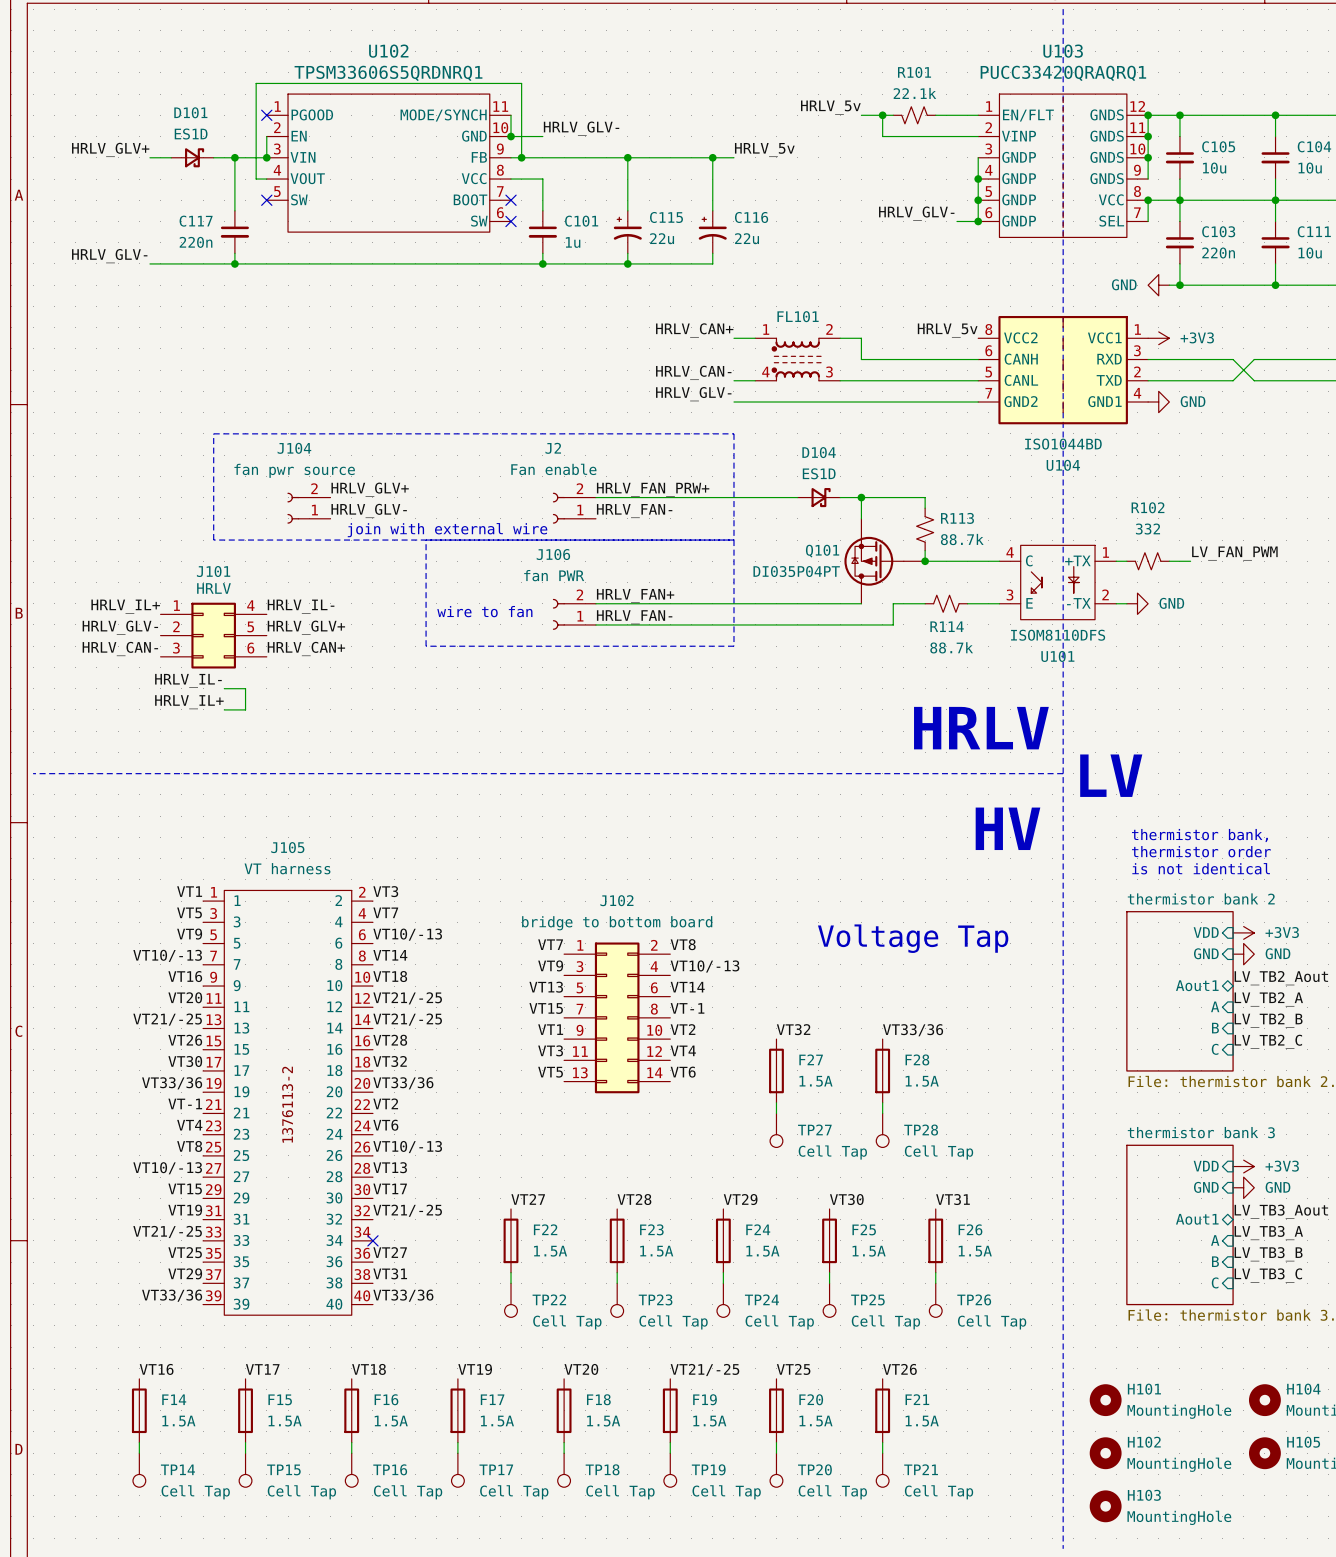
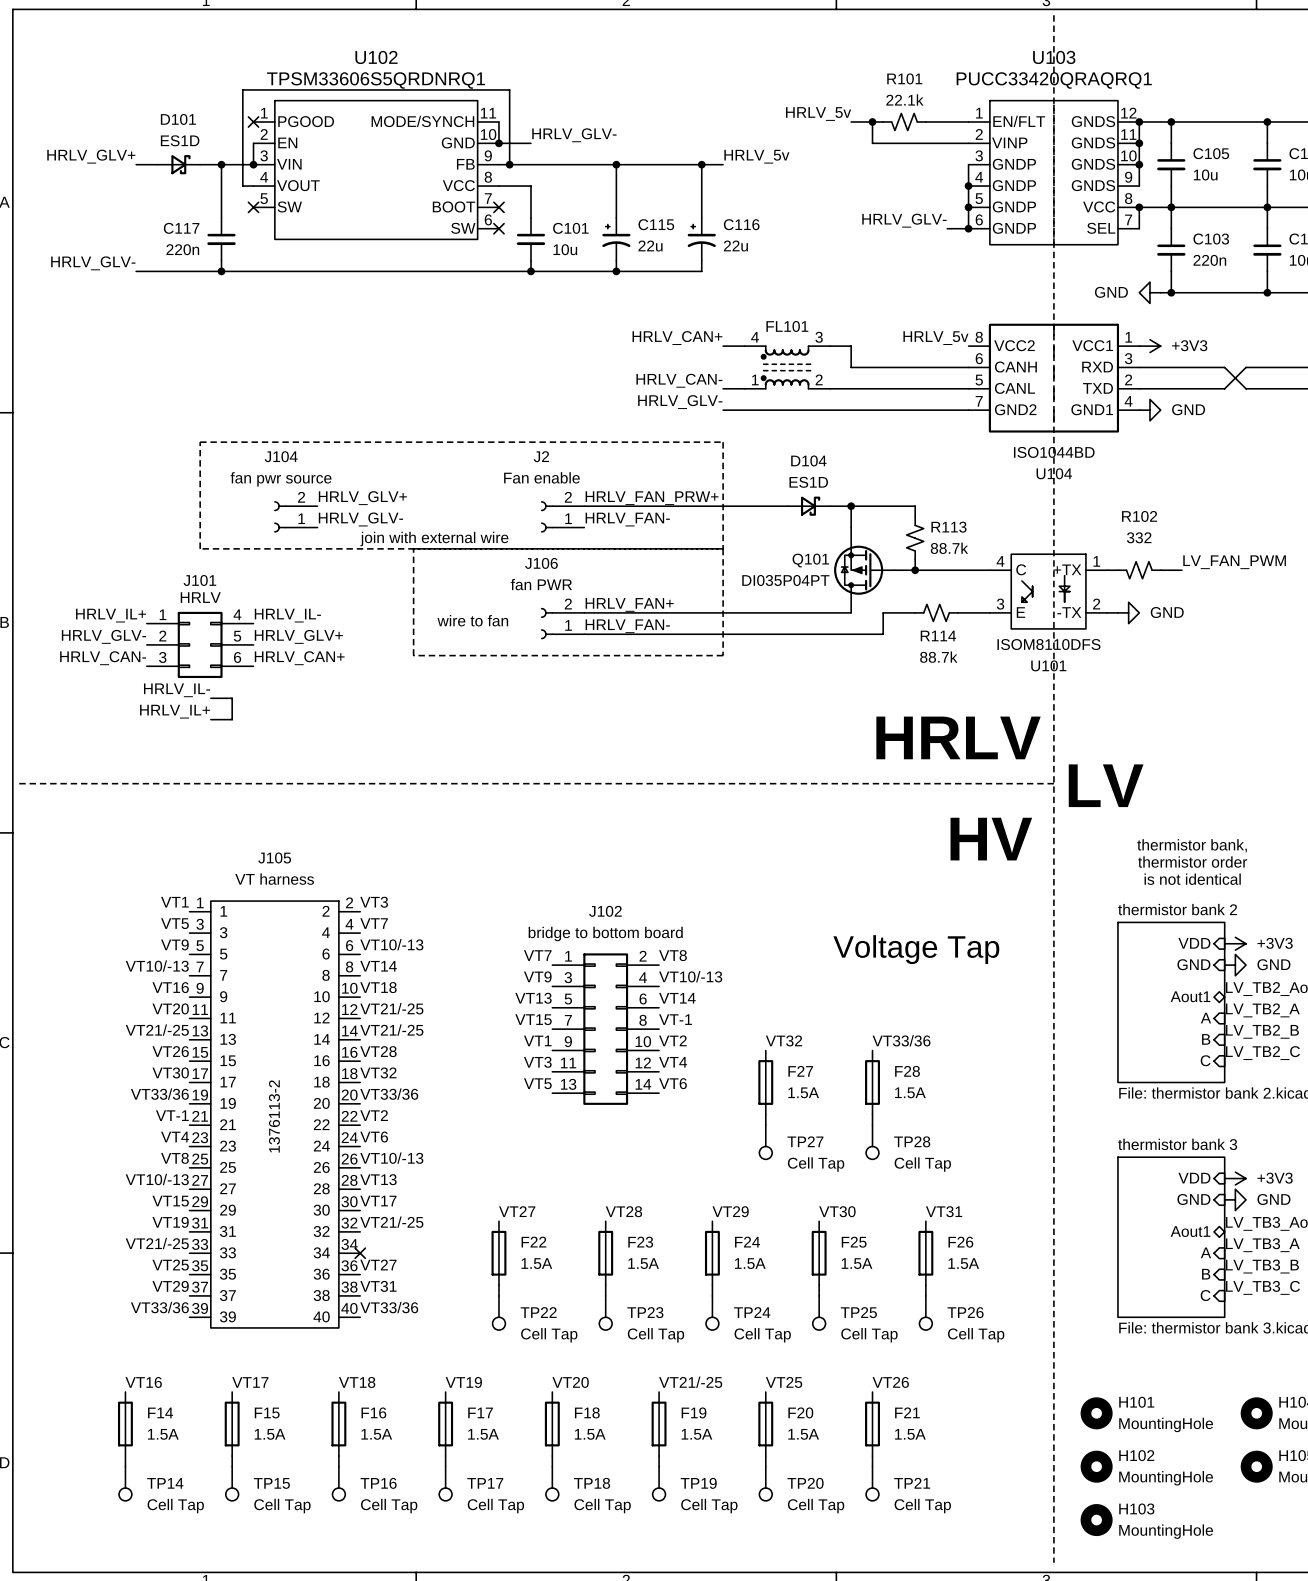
C101 value: 1u (573, 242) -> 10u (565, 249)
FL101 flip: as is (796, 359) -> up-down (786, 367)

